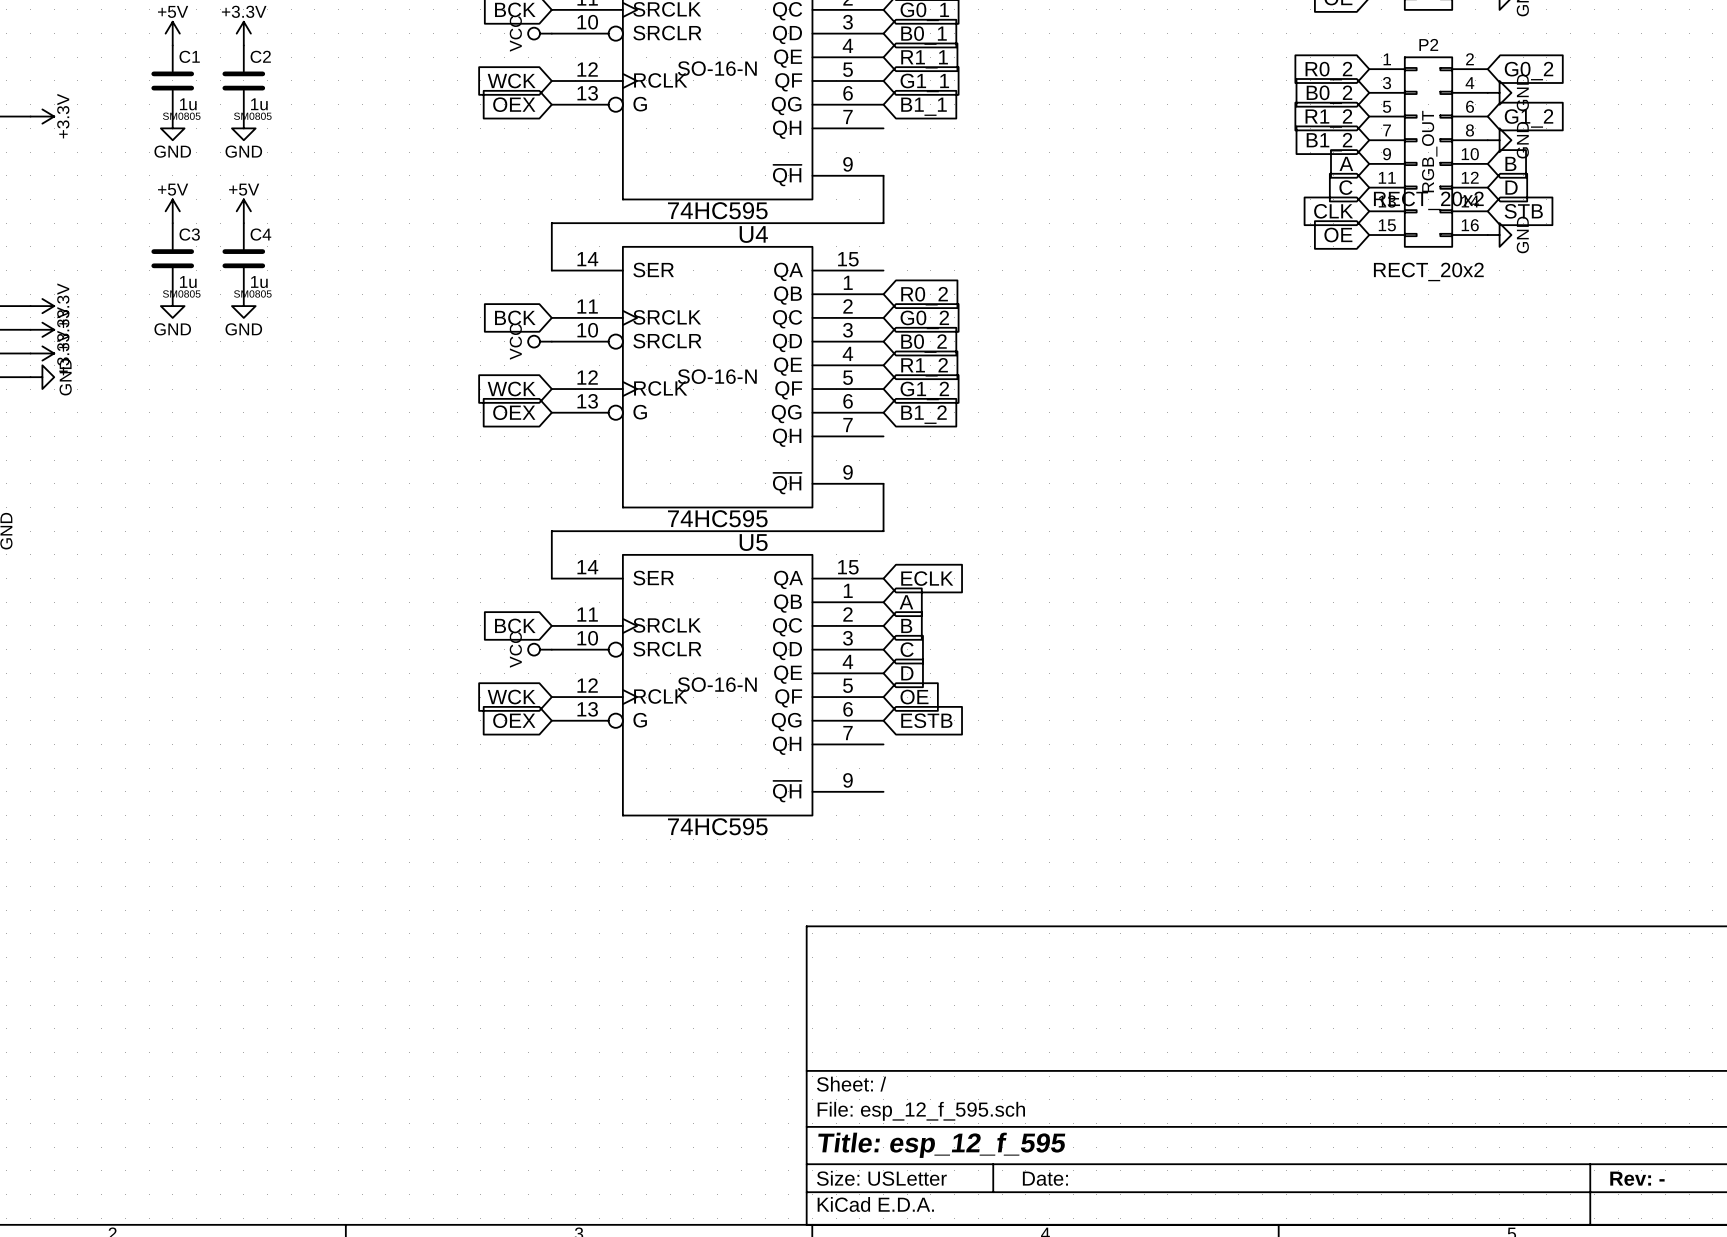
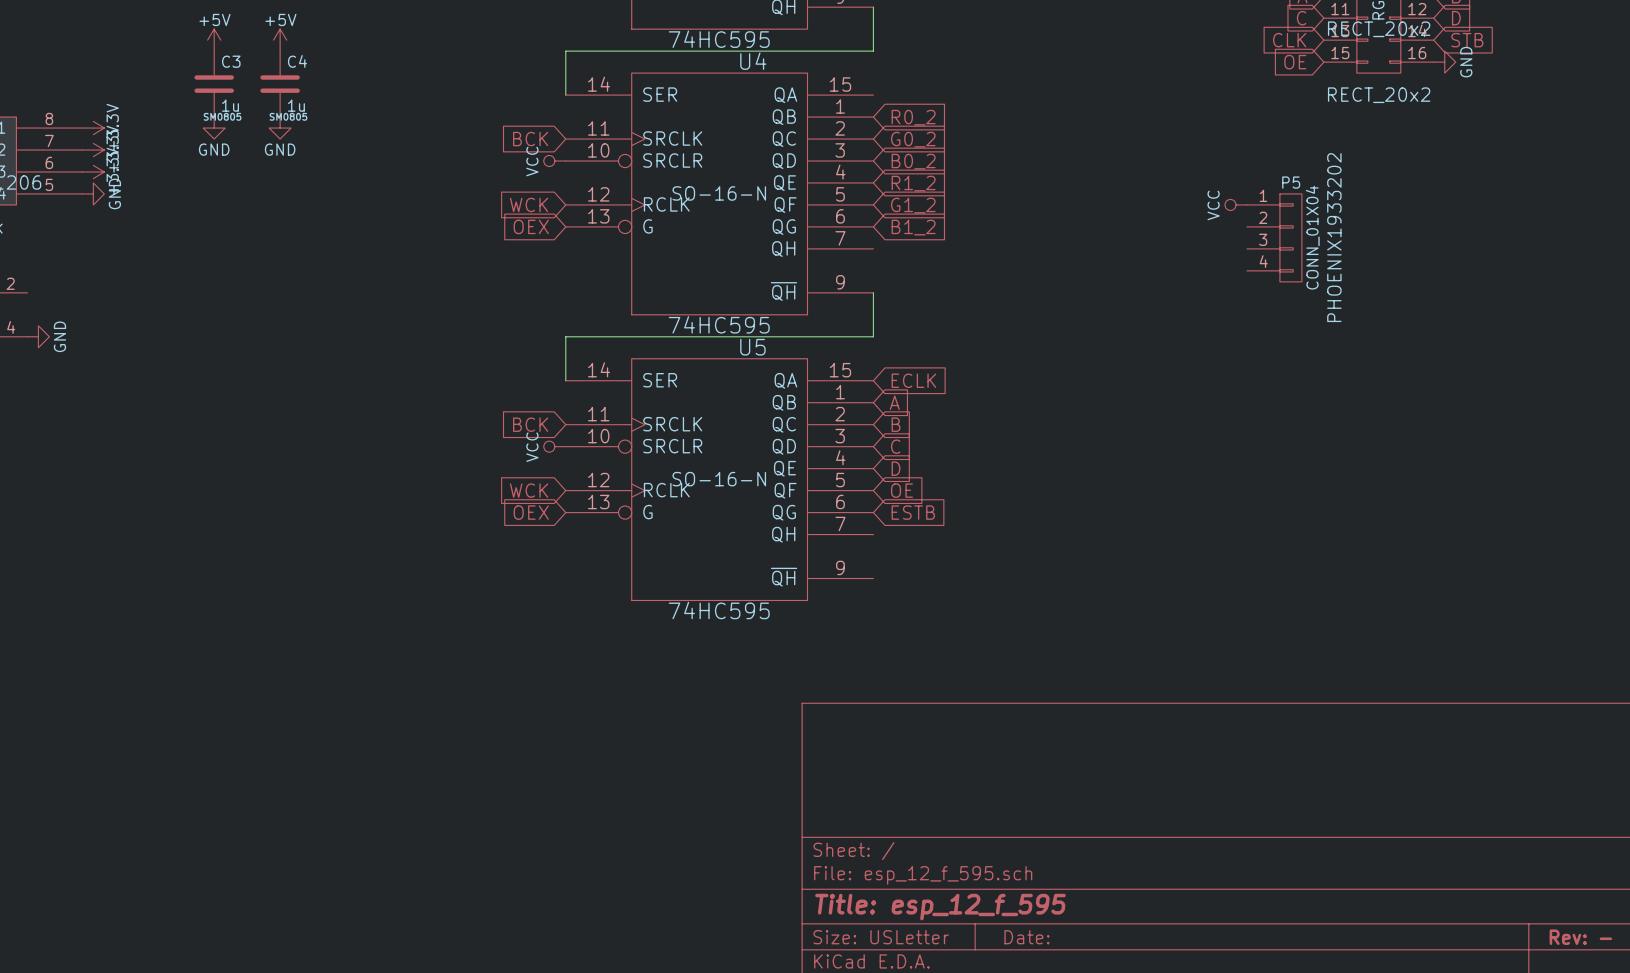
power symbol: none -> VCC (1235, 204)
P5: none -> CONN_01X04 (1274, 237)

